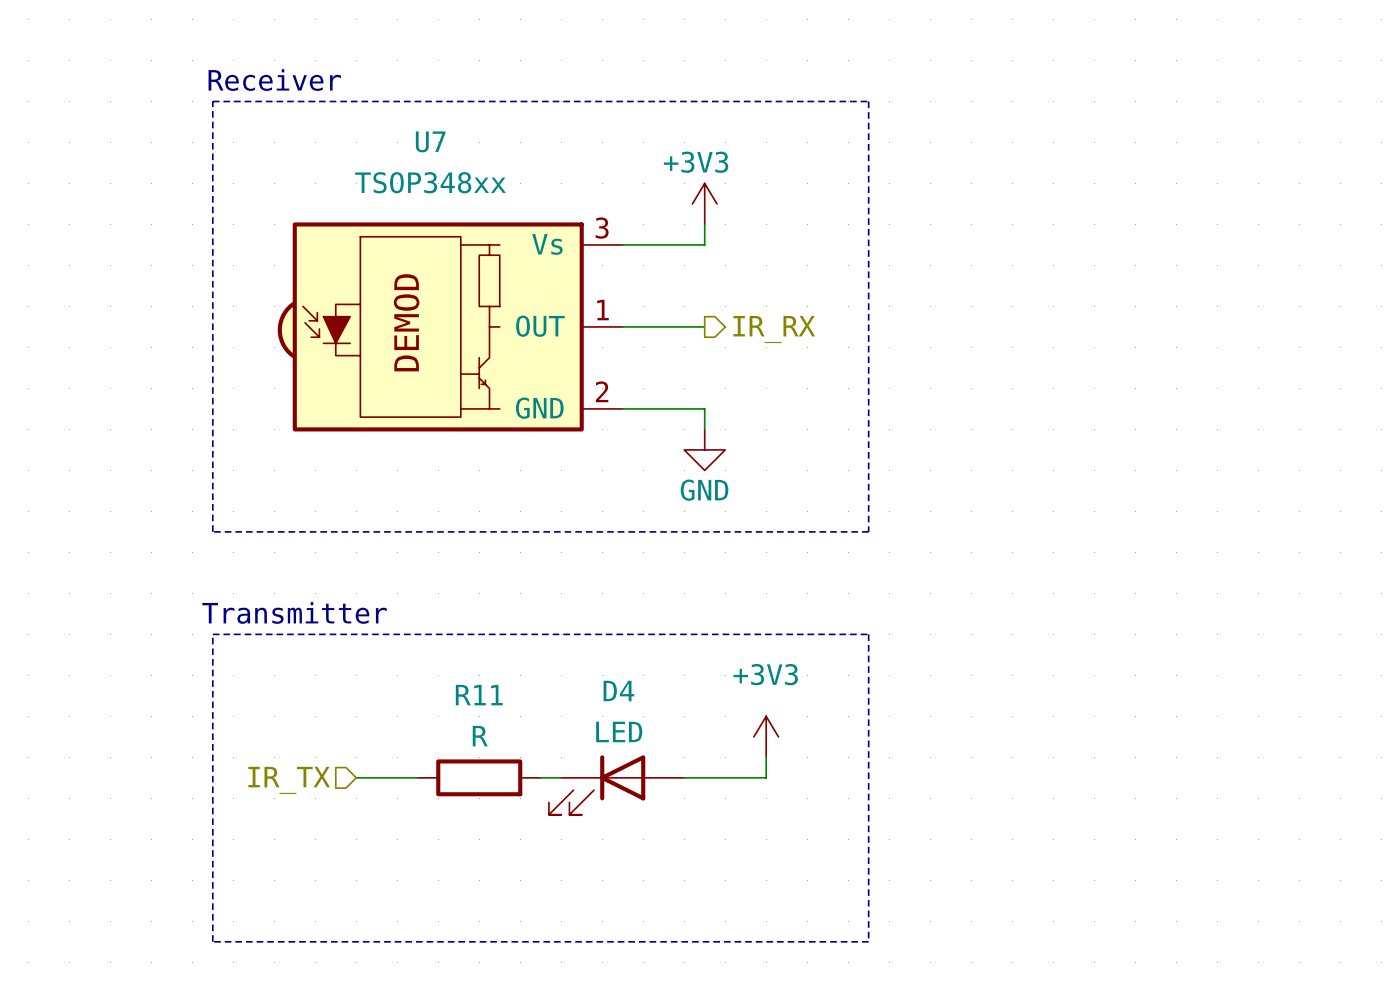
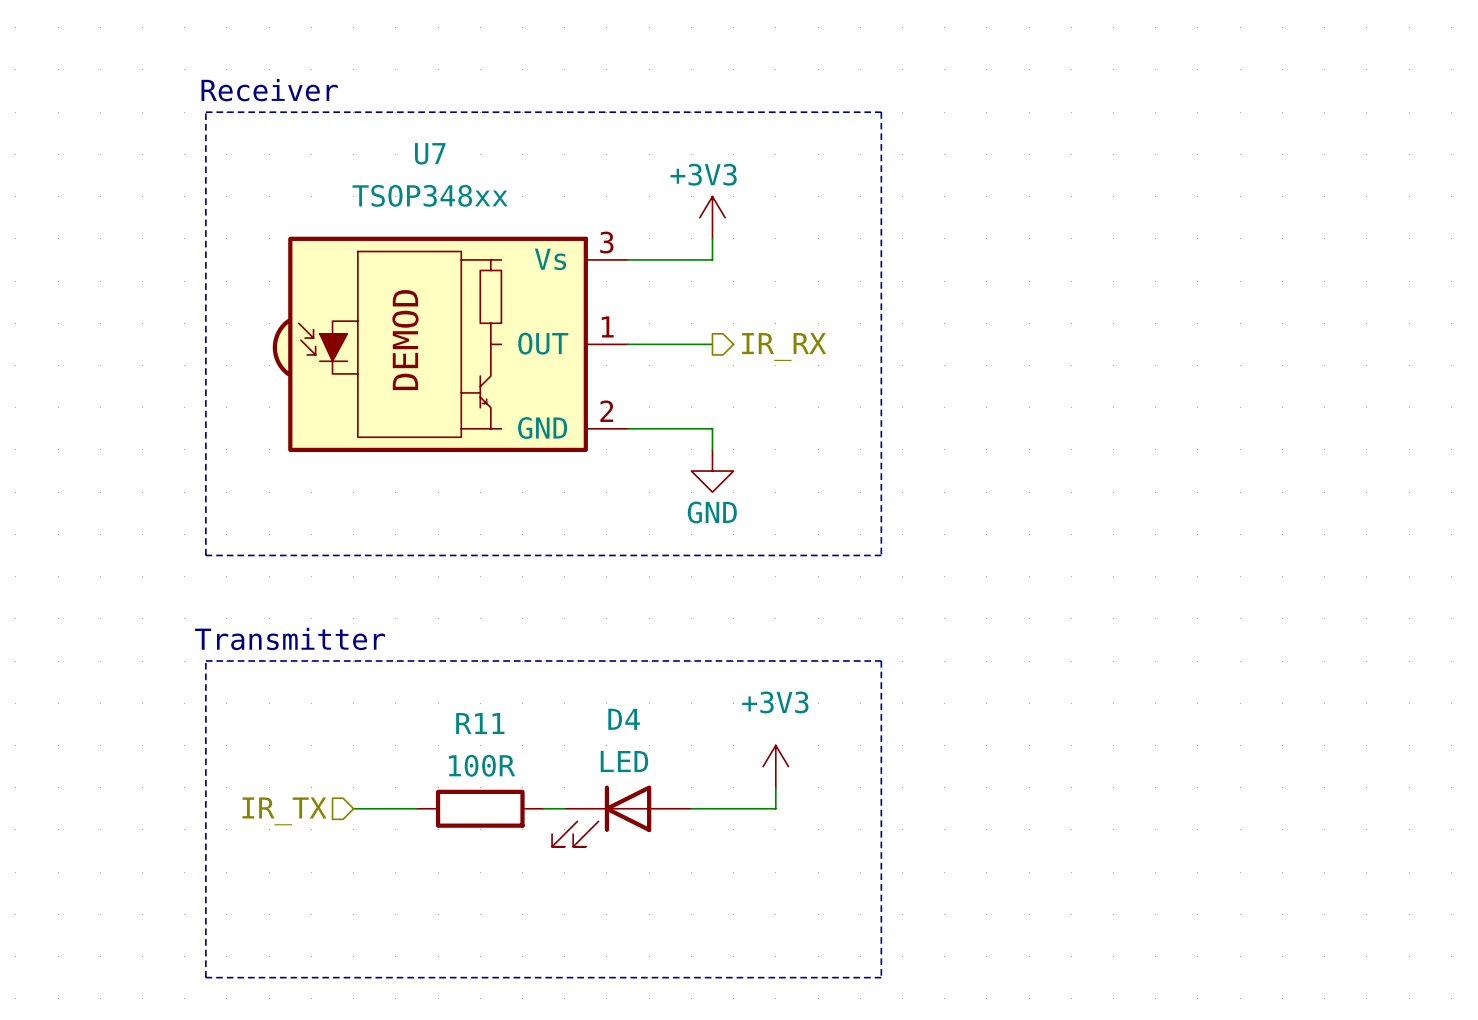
R11 value: R (480, 736) -> 100R (482, 765)

